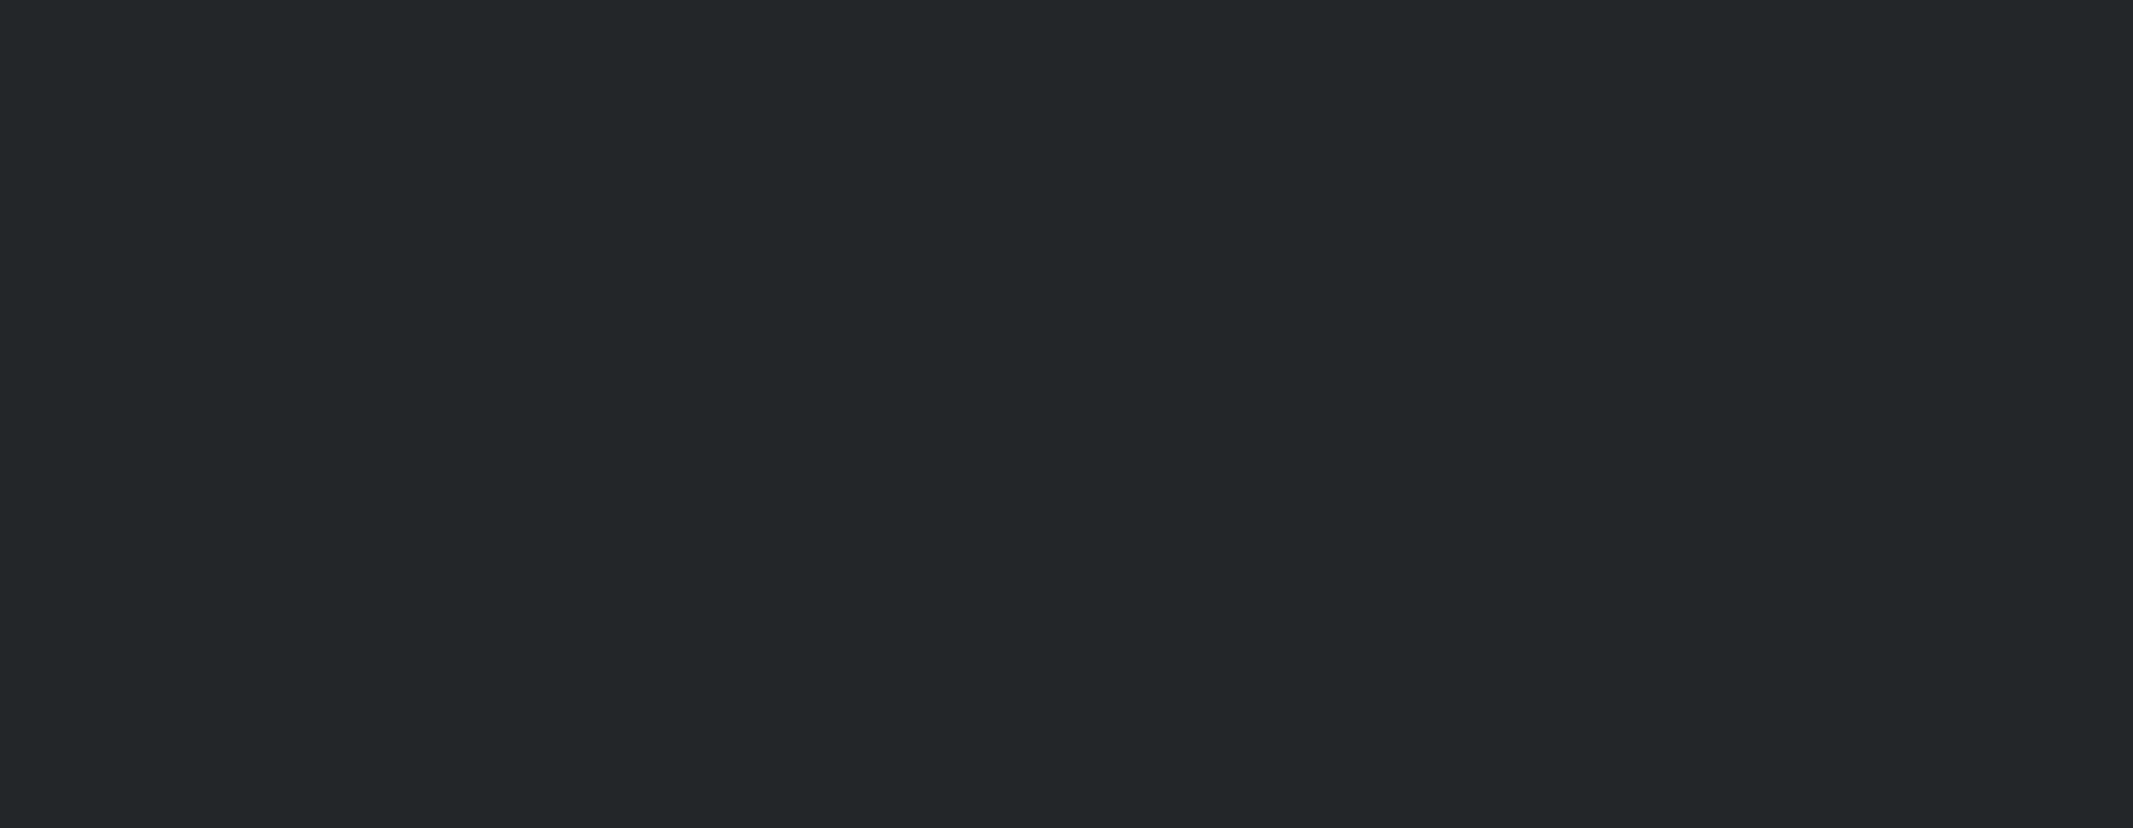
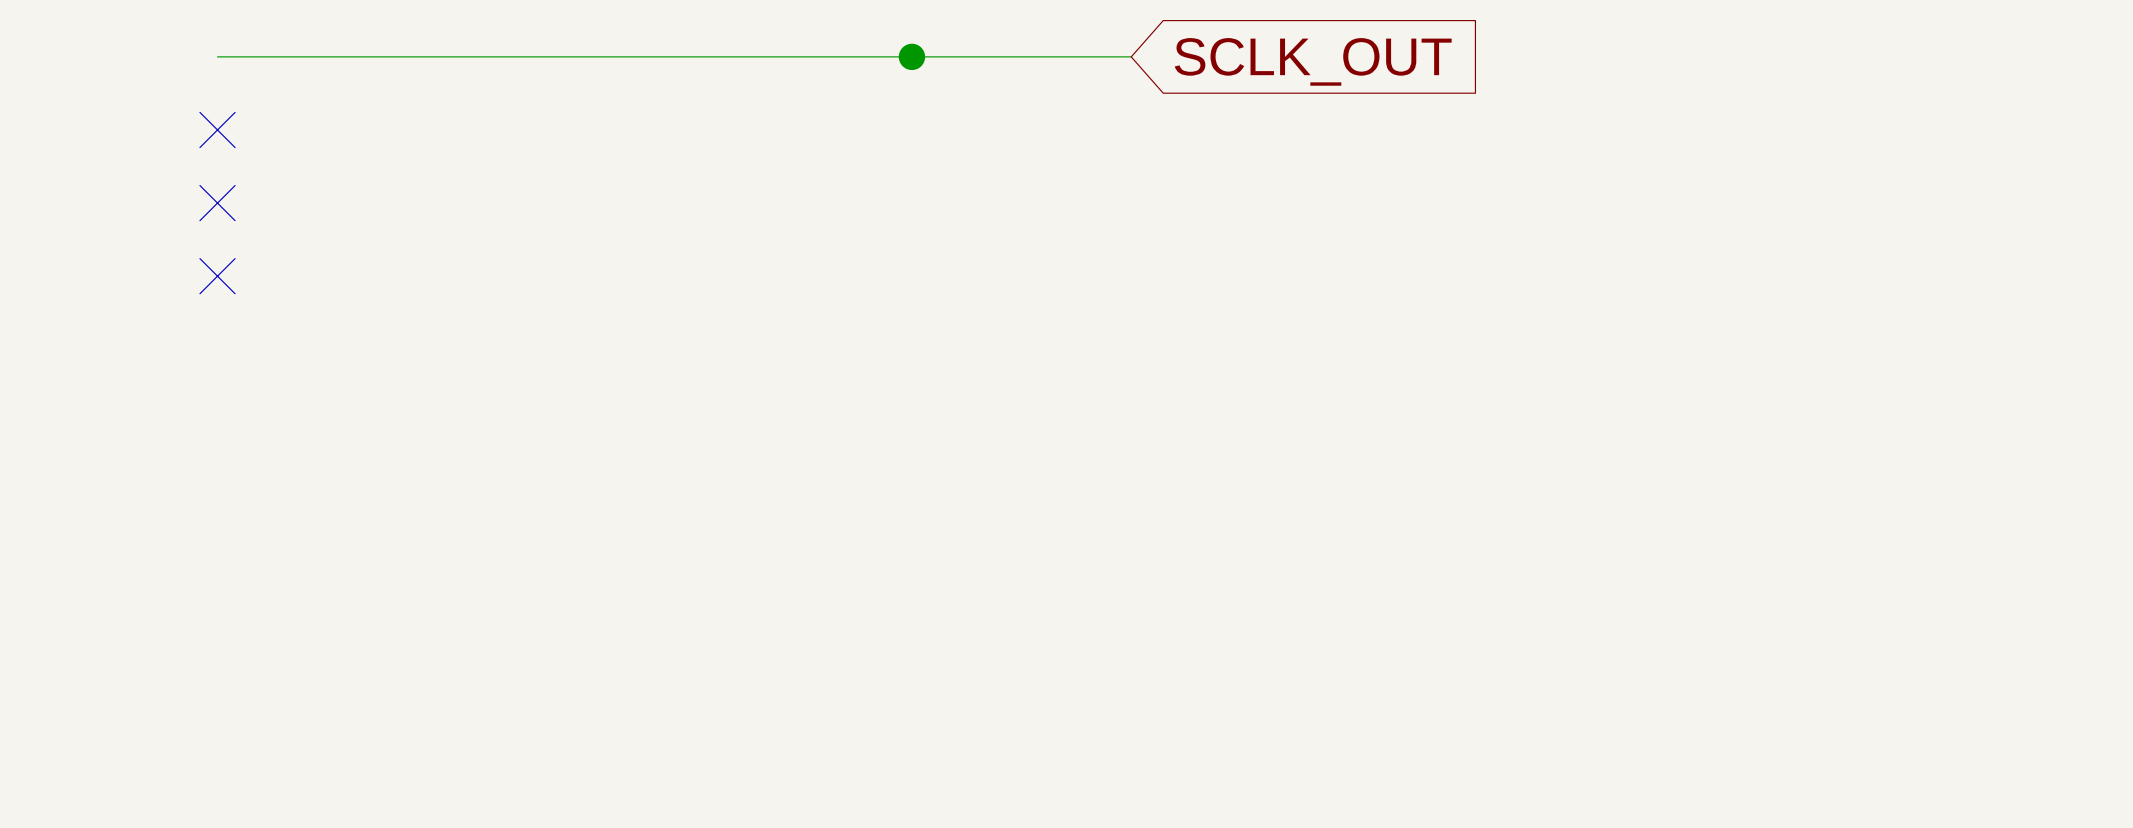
wire: none -> (217, 56) (1131, 56)
junction: none -> (911, 56)
global label: none -> SCLK_OUT (1313, 61)
no-connect mark: none -> (217, 129)
no-connect mark: none -> (217, 203)
no-connect mark: none -> (217, 276)

